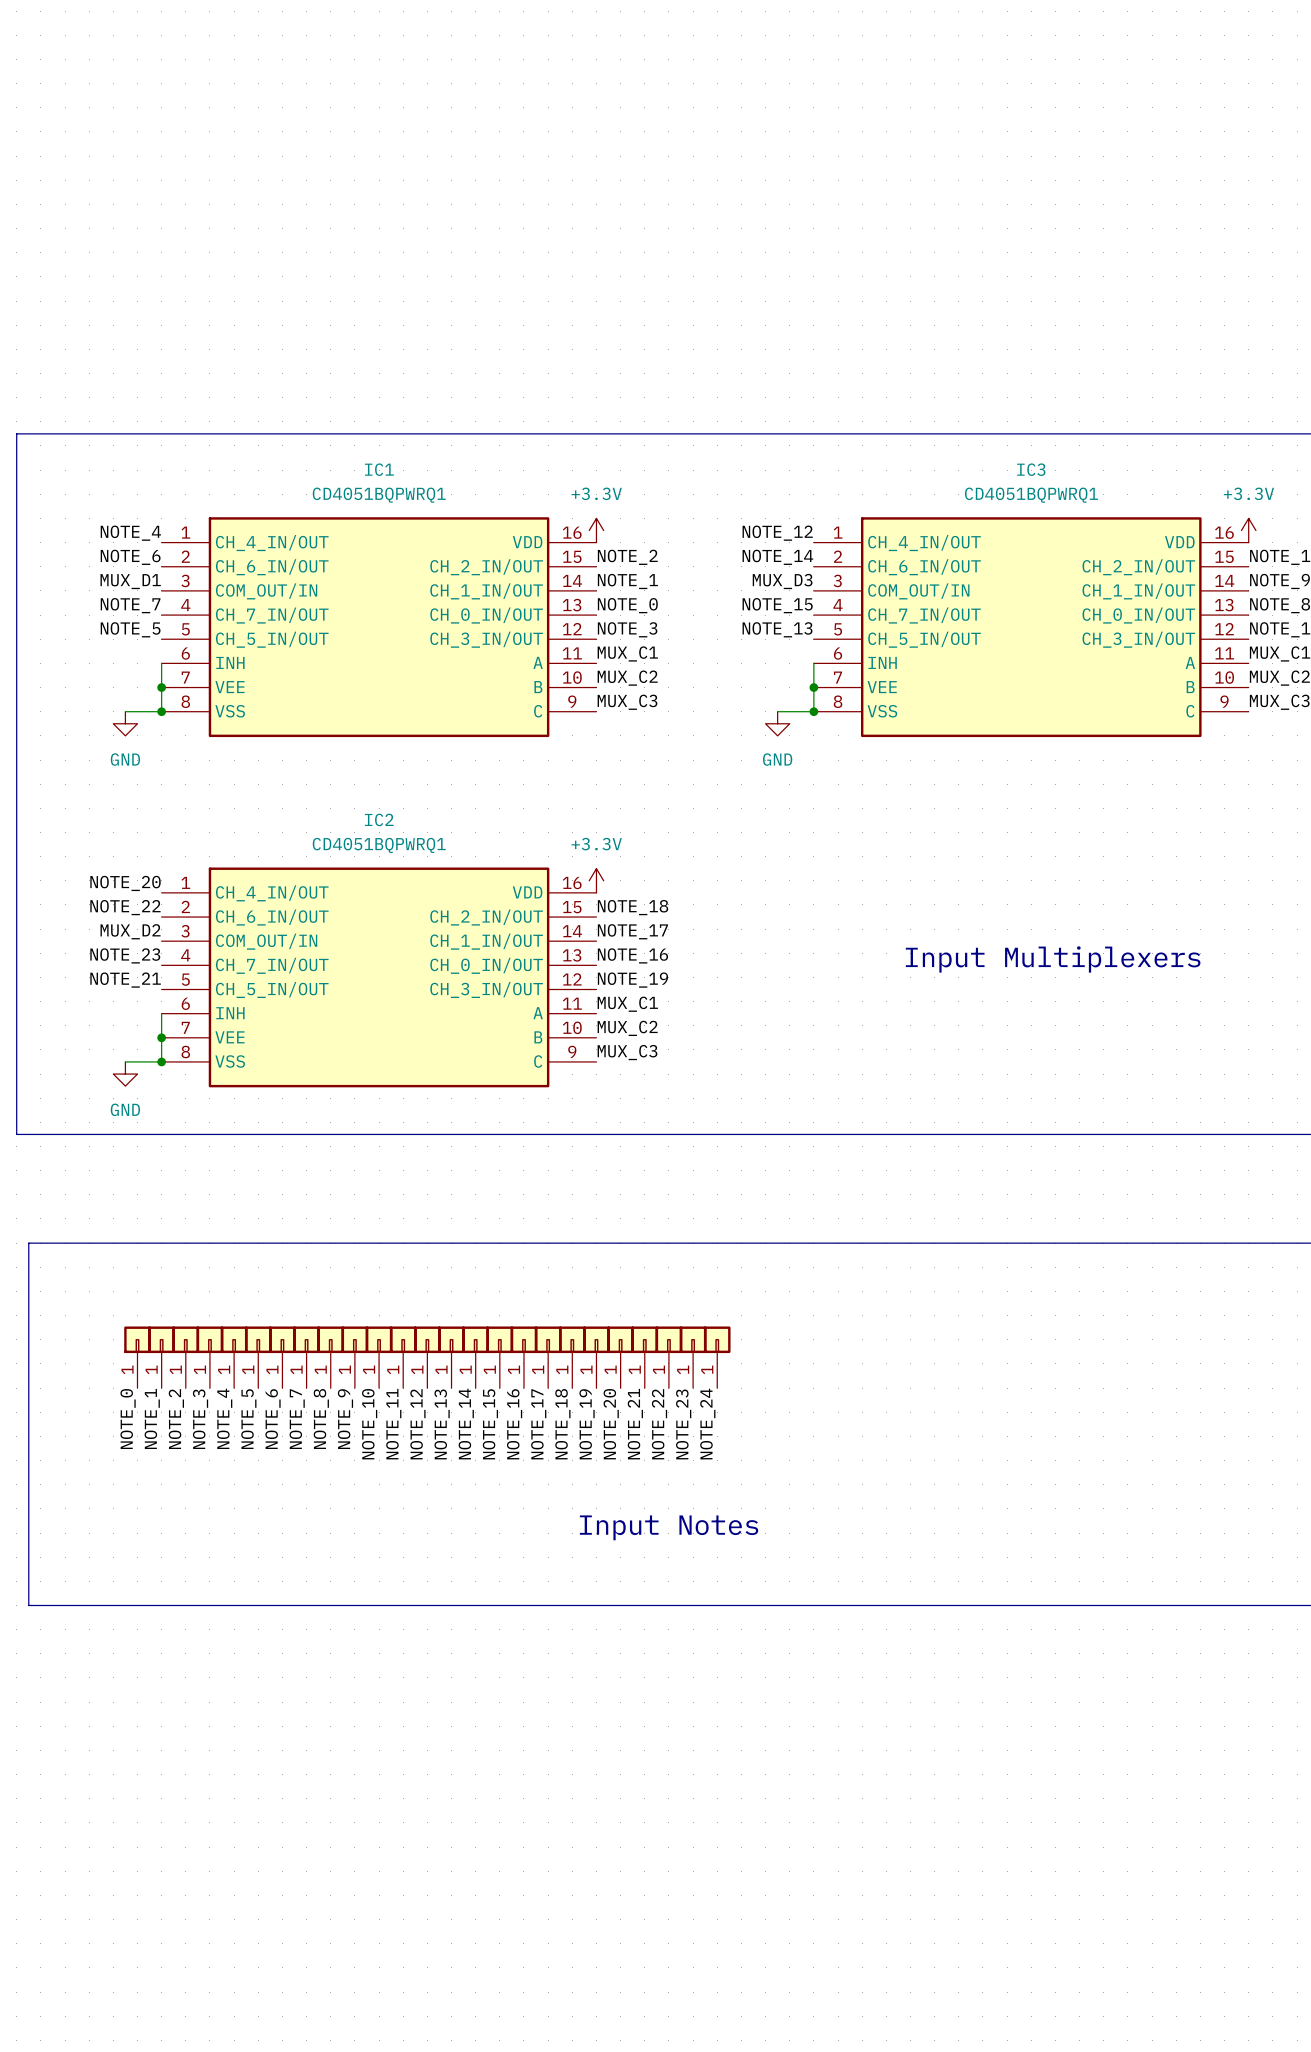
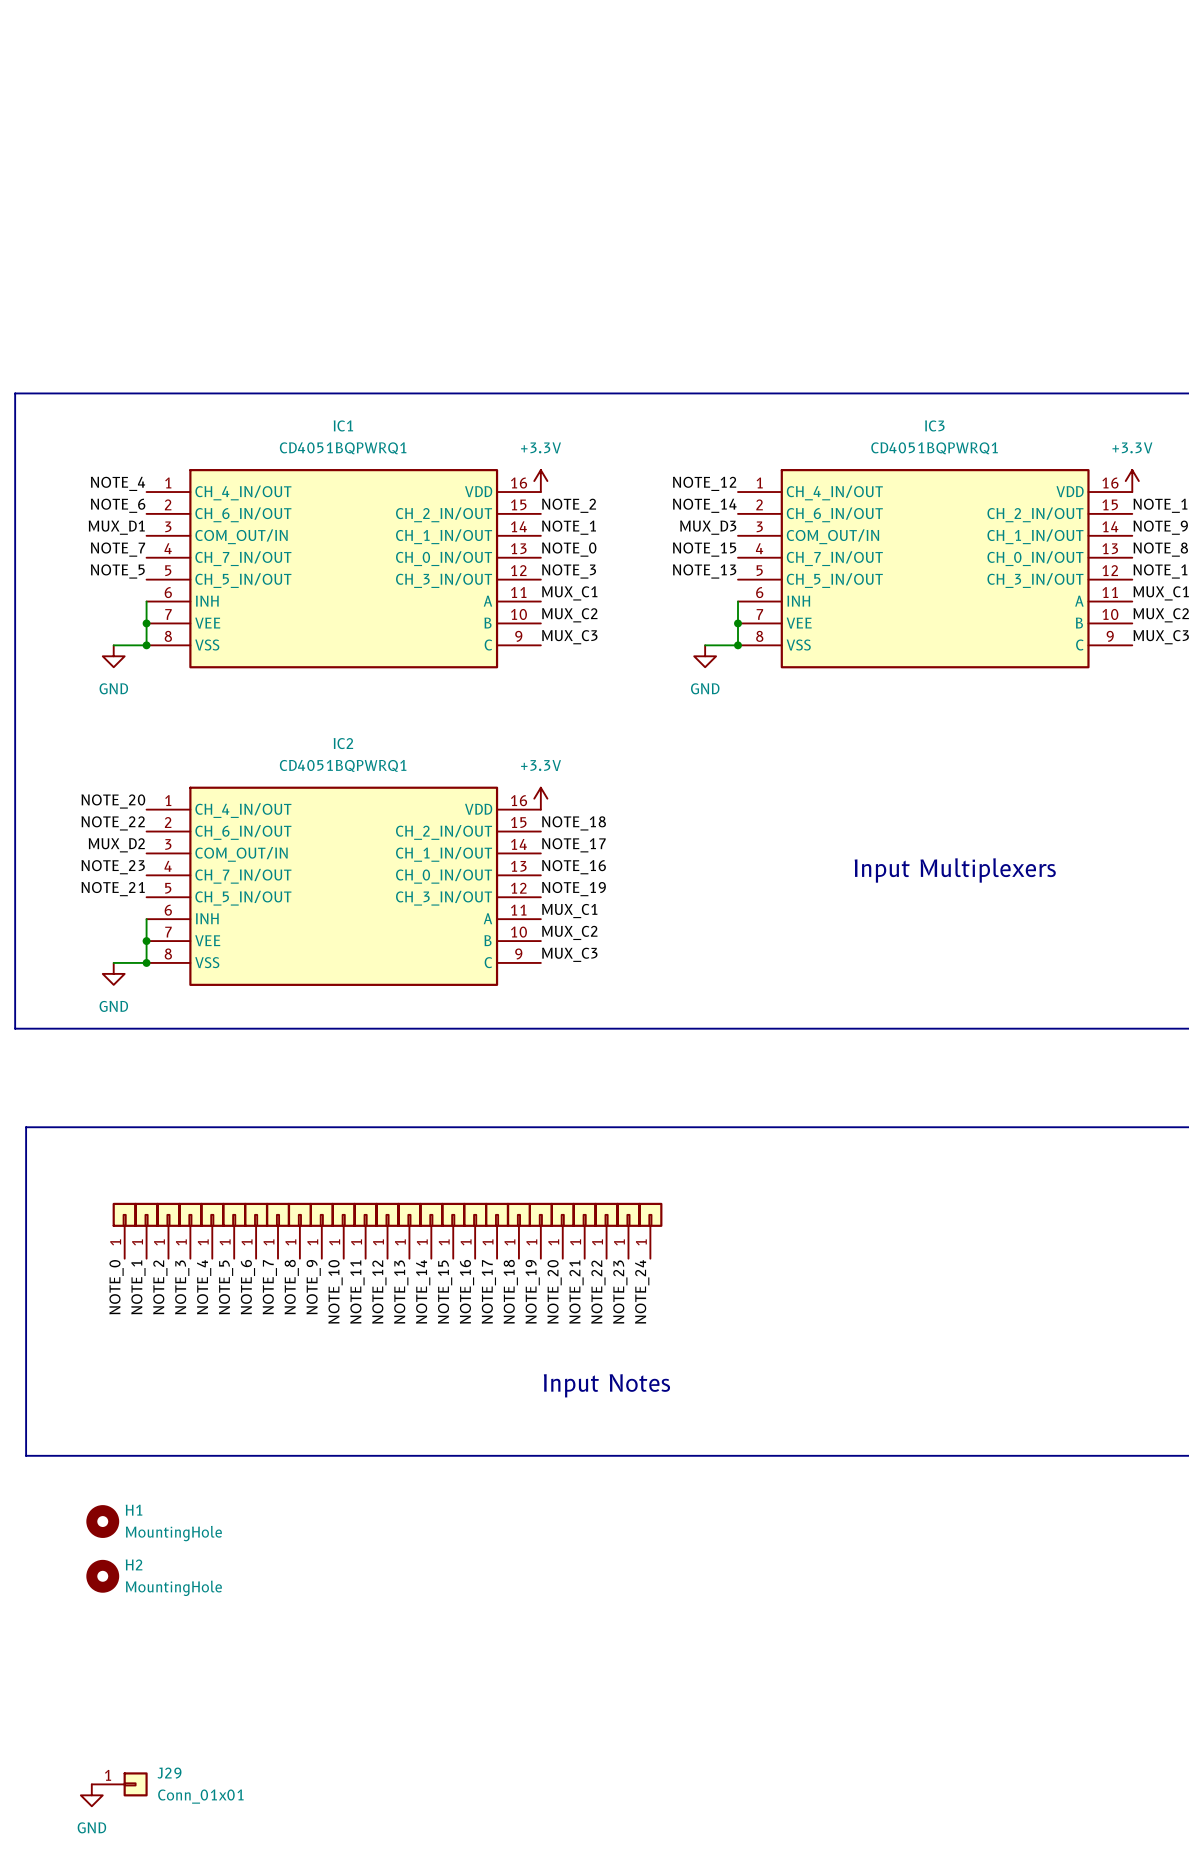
H1: none -> MountingHole (102, 1521)
H2: none -> MountingHole (102, 1576)
J29: none -> Conn_01x01 (119, 1784)
power symbol: none -> GND (91, 1795)

